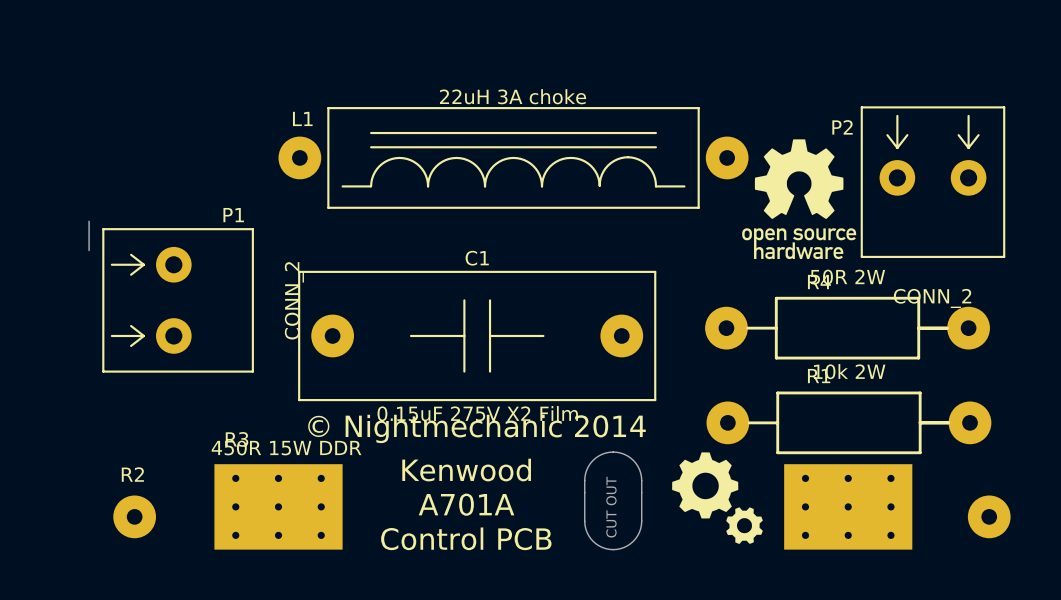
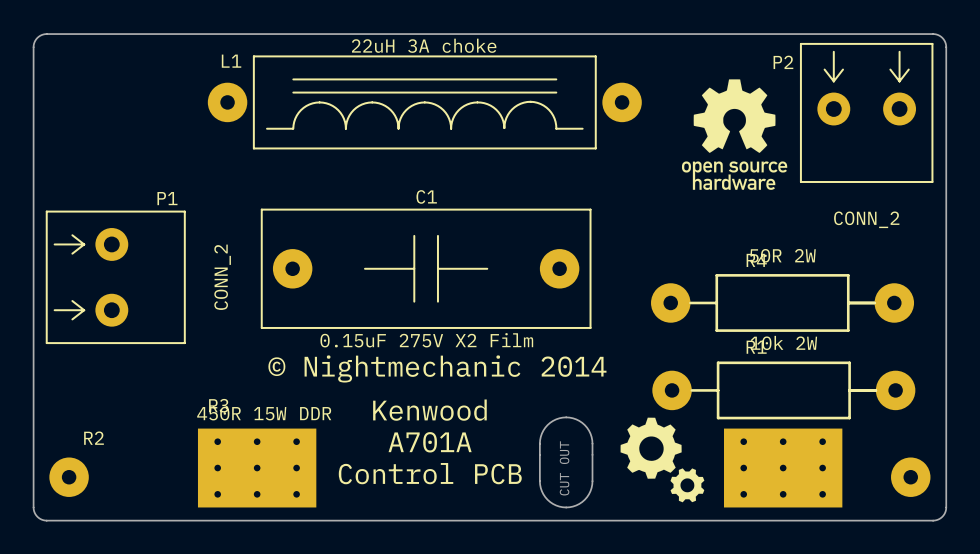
line: none -> (46, 34) (933, 34) (939, 35) (944, 40) (946, 47) (946, 507) (944, 514) (939, 518) (933, 520) (46, 520) (40, 518) (35, 514) (33, 507) (33, 47) (37, 37) (46, 34)
L1 name position: L1 (302, 118) -> L1 (231, 61)
L1 position: (513, 157) -> (424, 102)
P2 position: (932, 182) -> (866, 112)
drawing position: (799, 199) -> (734, 134)
line: (89, 221) (89, 250) -> none
P1 position: (178, 300) -> (115, 277)
C1 position: (477, 335) -> (426, 268)
text position: © Nightmechanic 2014 (476, 428) -> © Nightmechanic 2014 (437, 368)
text position: Kenwood (466, 470) -> Kenwood (429, 410)
R2 footprint: [113, 495, 1011, 539] -> [49, 457, 931, 497]
text position: A701A (466, 504) -> A701A (430, 442)
text position: Control PCB (466, 538) -> Control PCB (430, 473)

